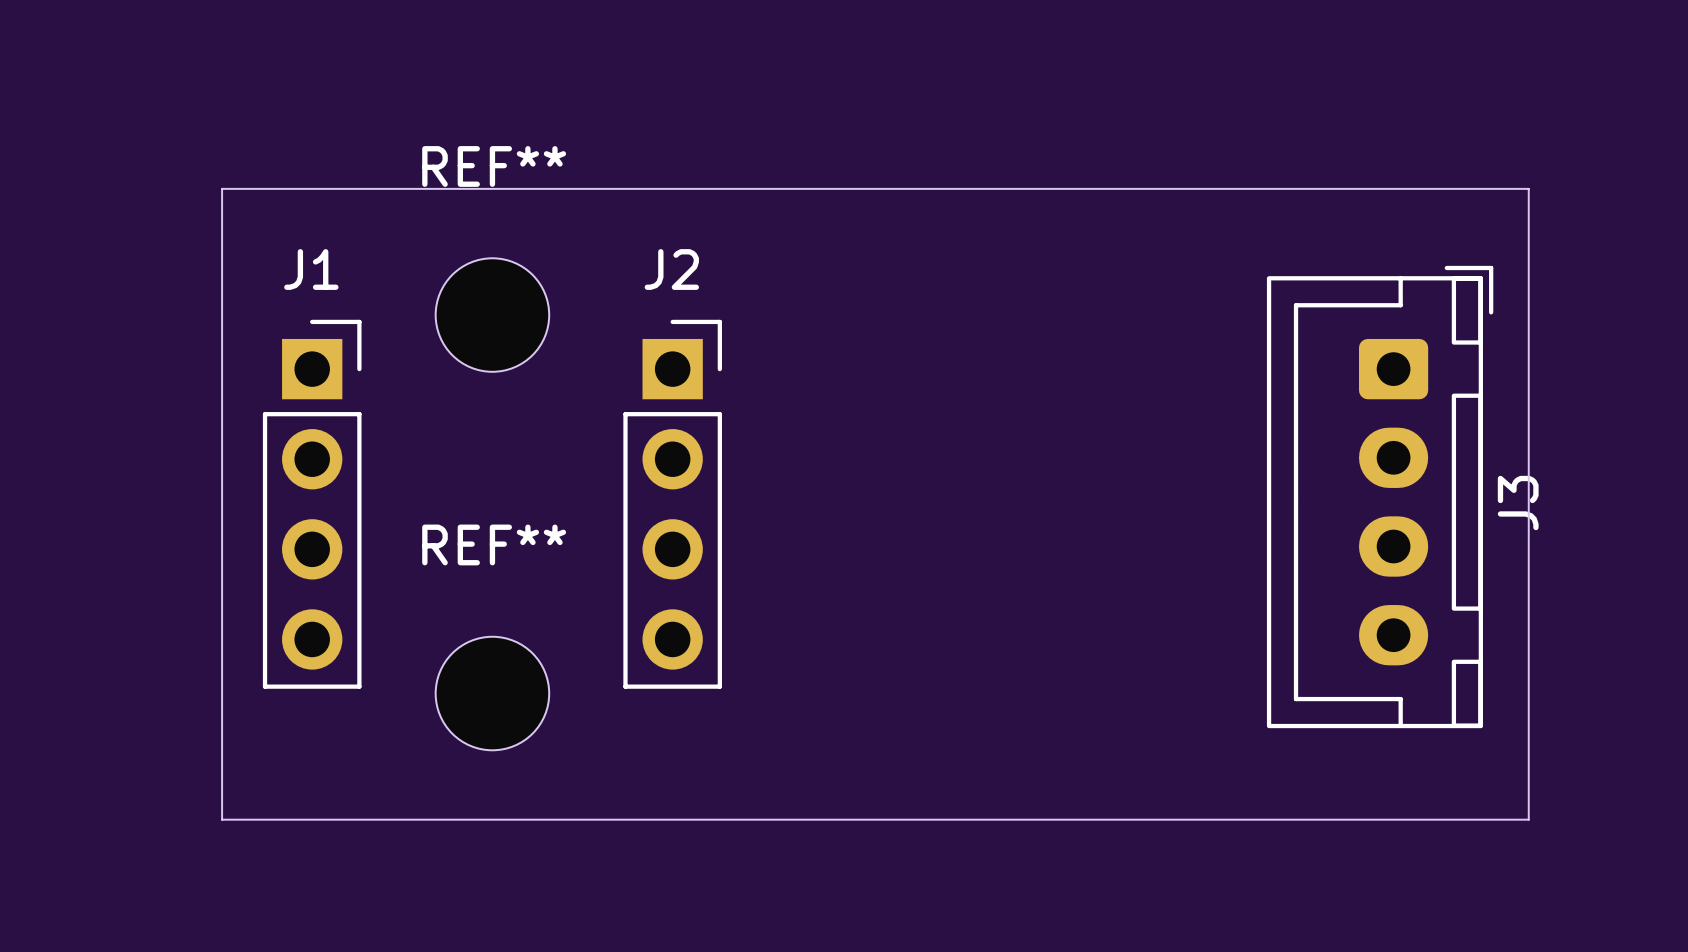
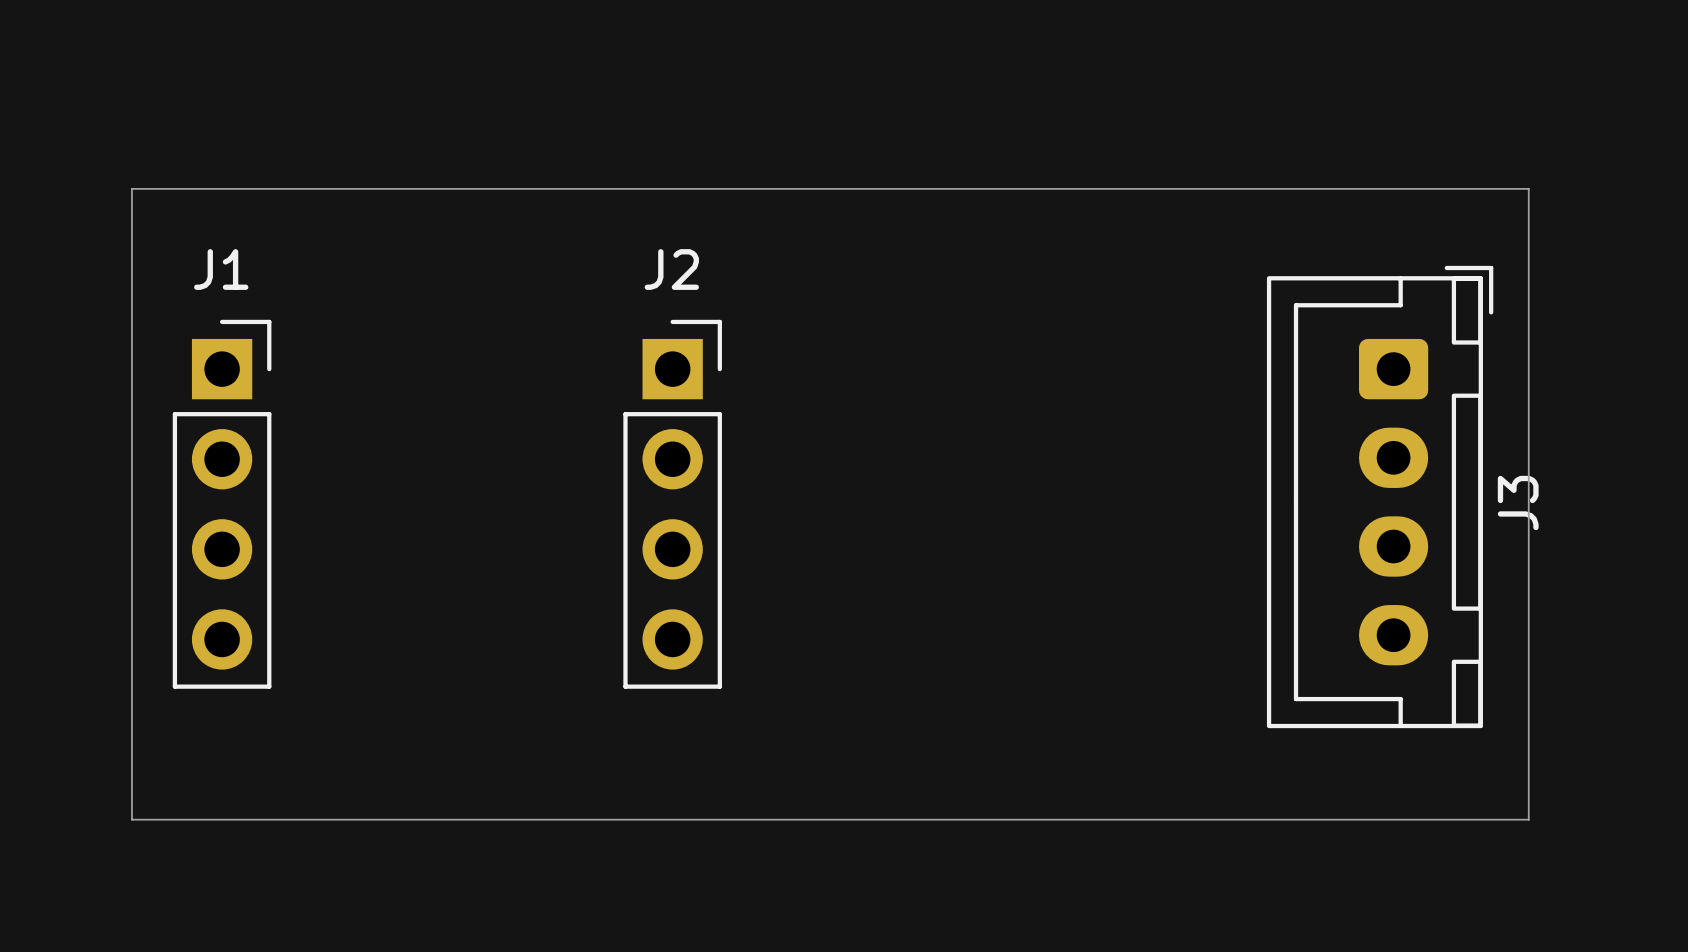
board edge: (222, 188) (222, 819) -> (222, 188) (131, 188) (131, 819) (222, 819)
REF**: (492, 315) -> none
J1 position: (312, 504) -> (222, 504)
REF**: (492, 693) -> none

